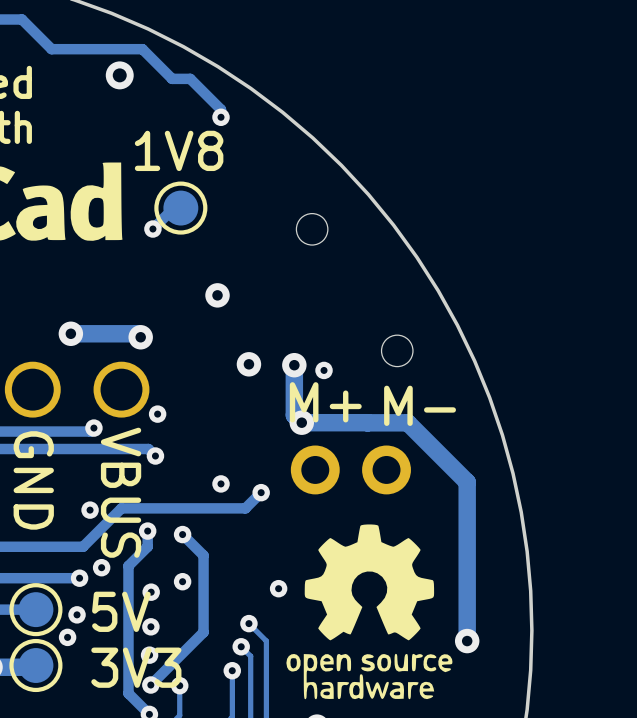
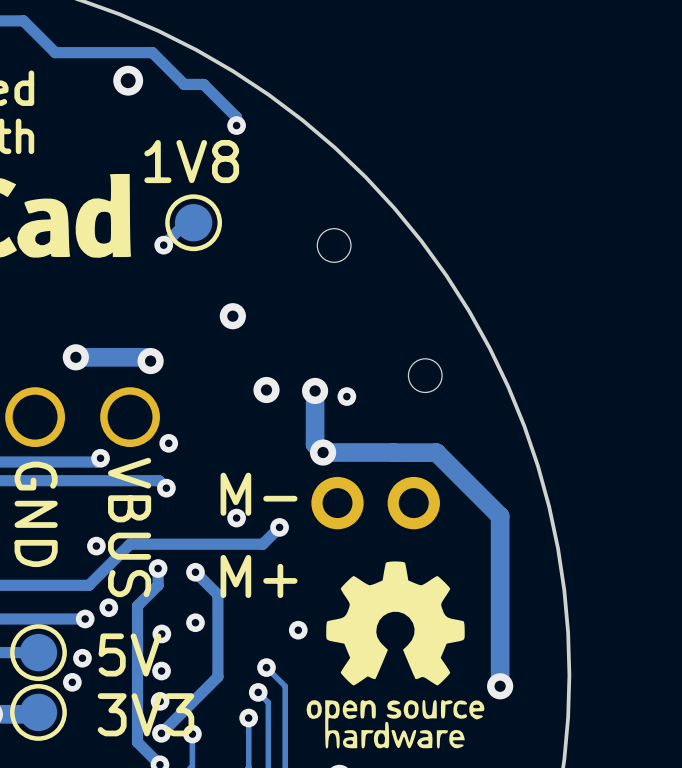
text position: M+ (325, 402) -> M+ (259, 576)
text position: M- (420, 405) -> M- (259, 494)

